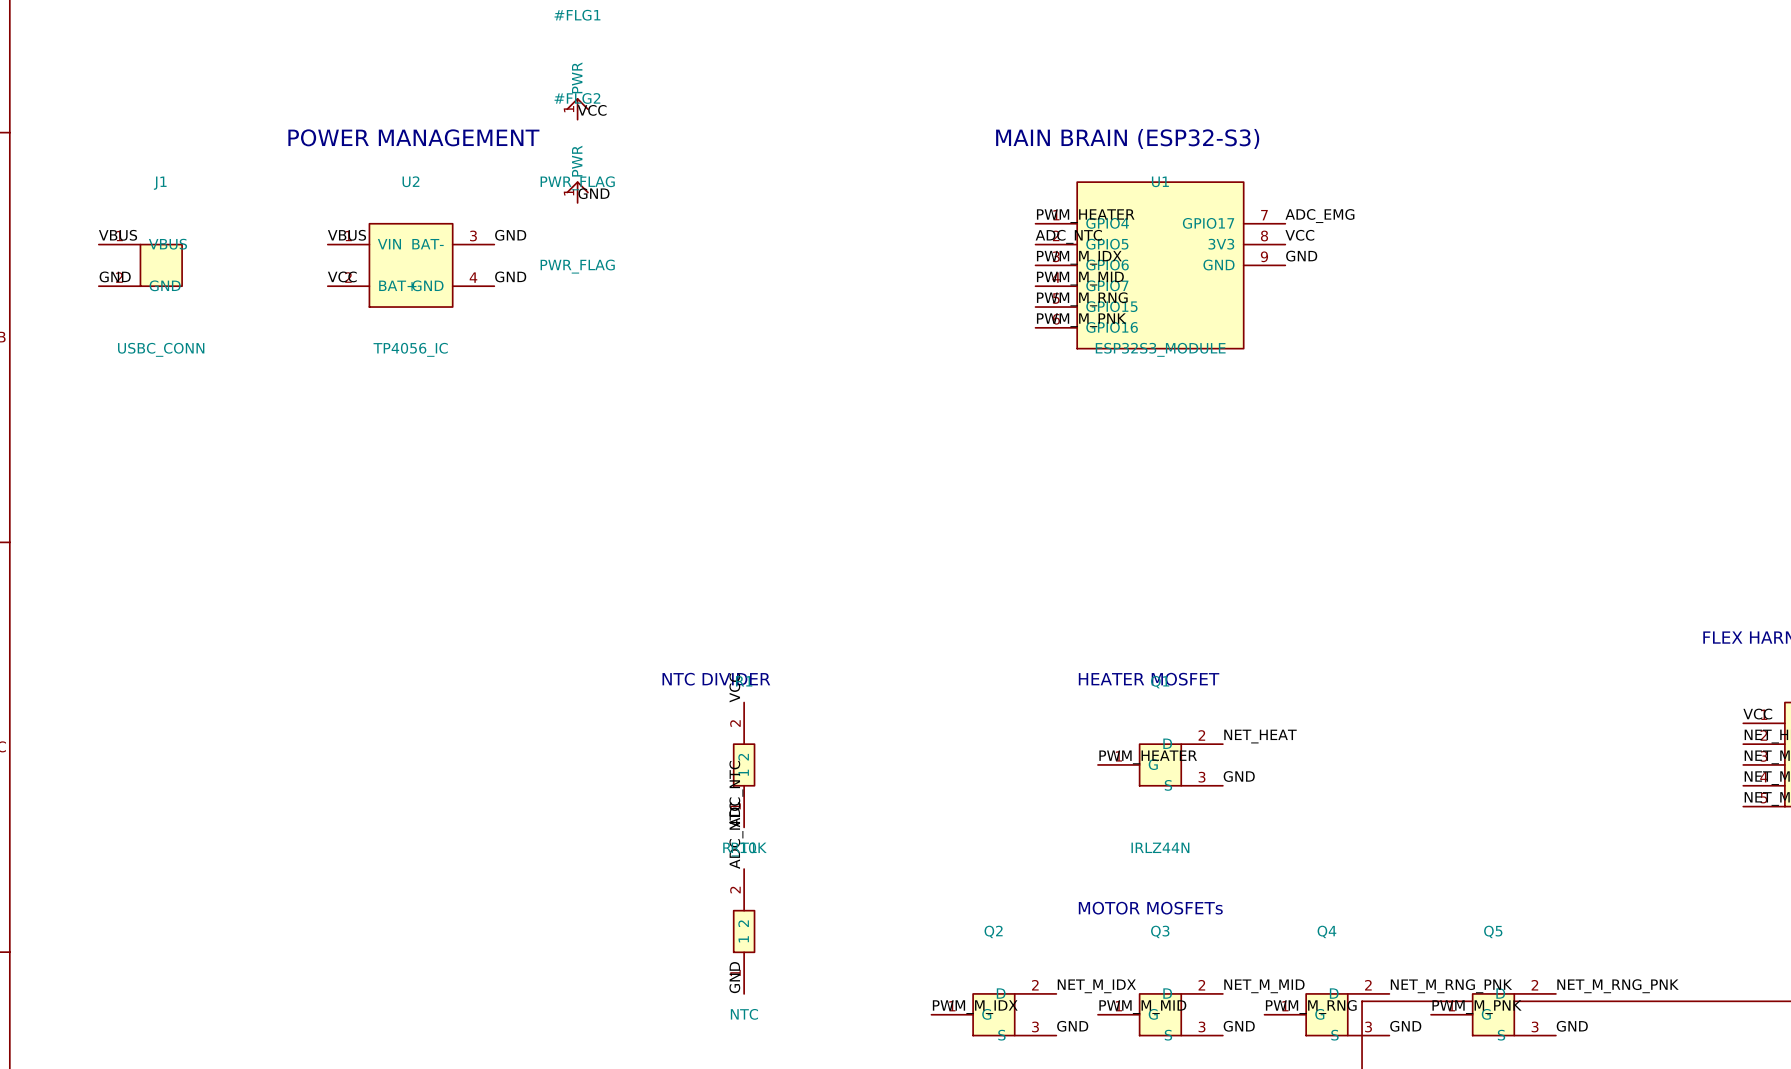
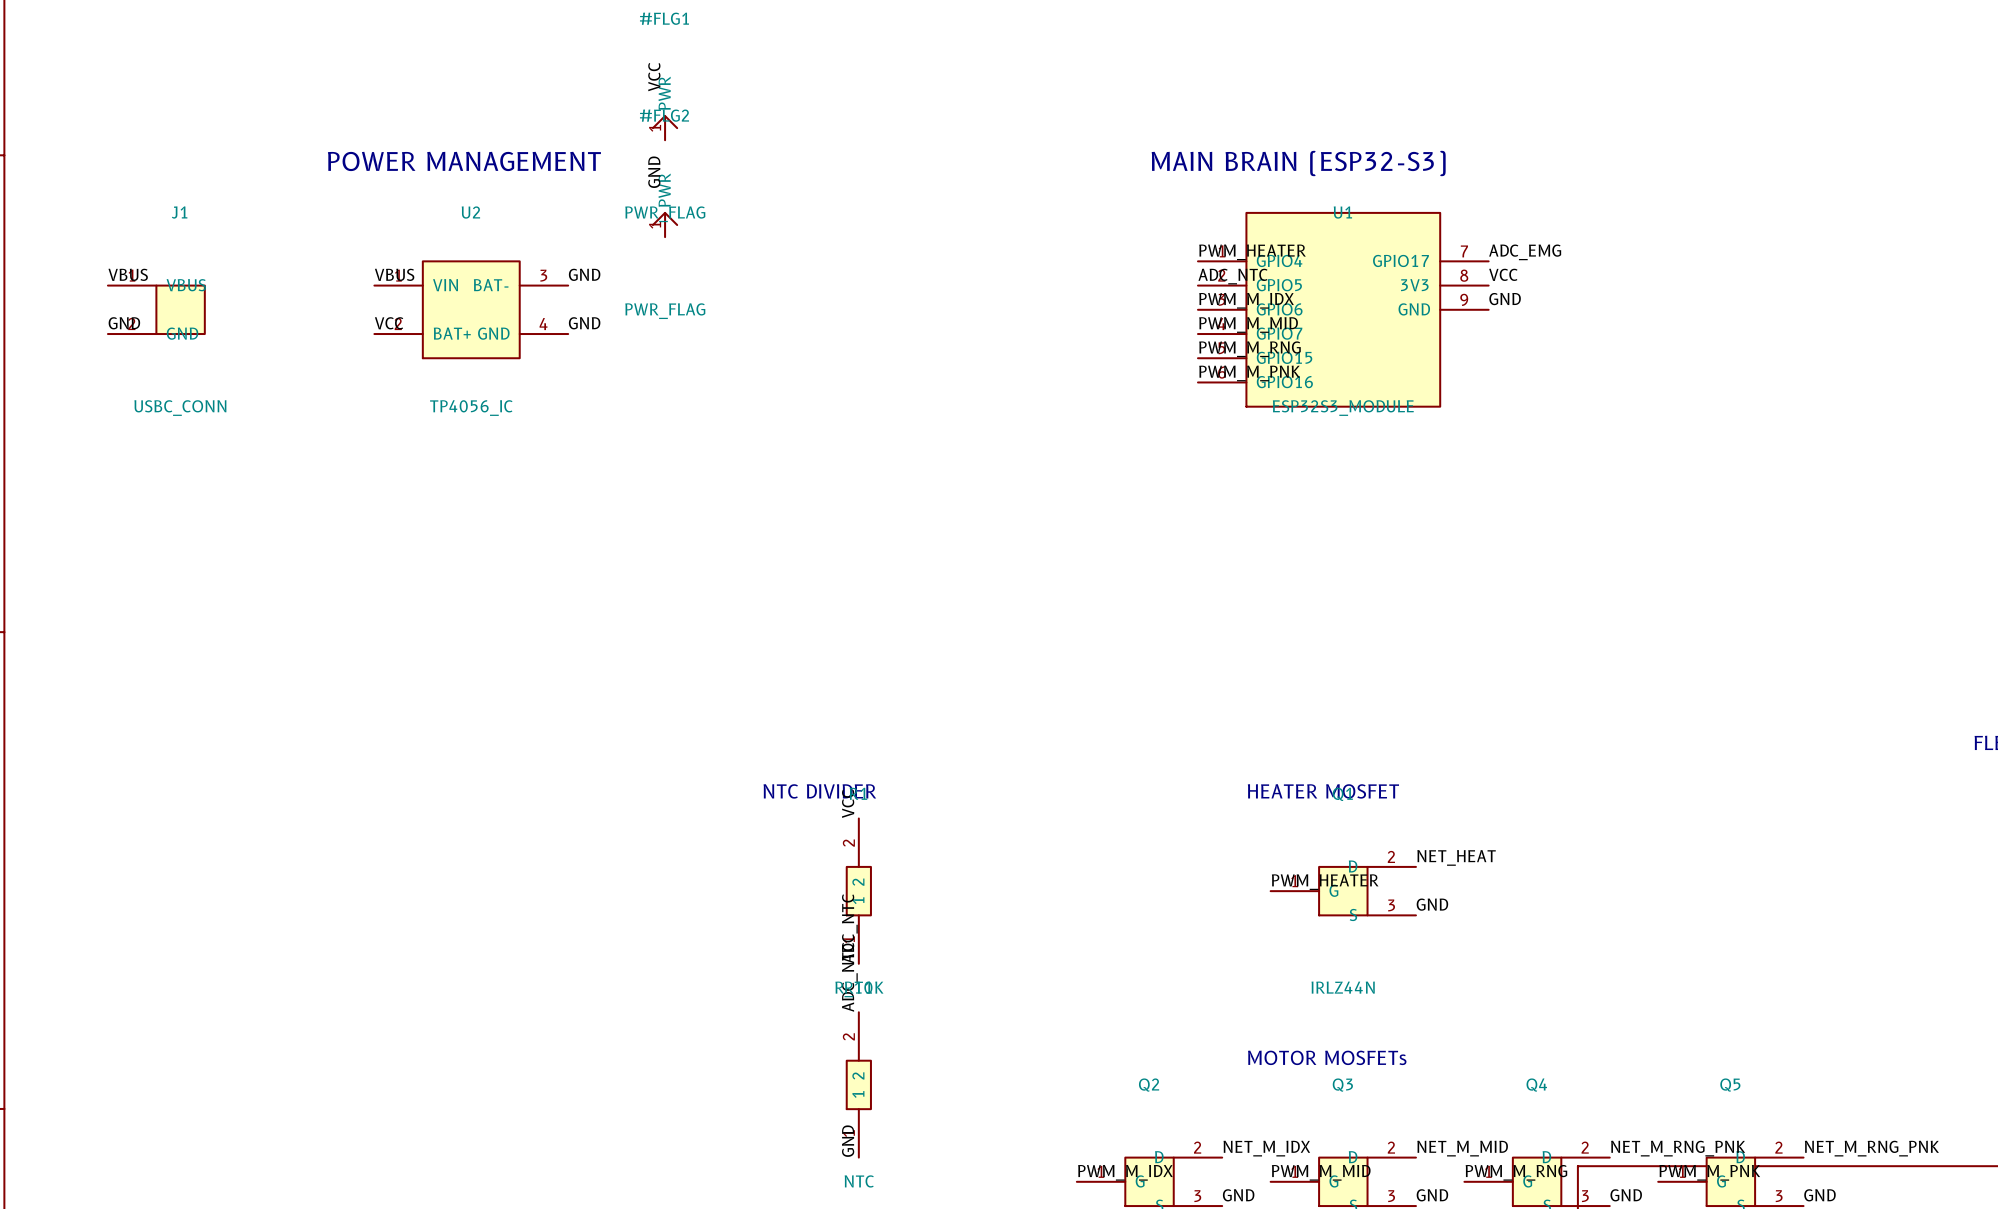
label rotation: 0° (592, 110) -> 90° counterclockwise (654, 77)
label position: VCC (592, 110) -> VCC (654, 77)
label rotation: 0° (593, 193) -> 90° counterclockwise (654, 172)
label position: GND (593, 193) -> GND (654, 172)

